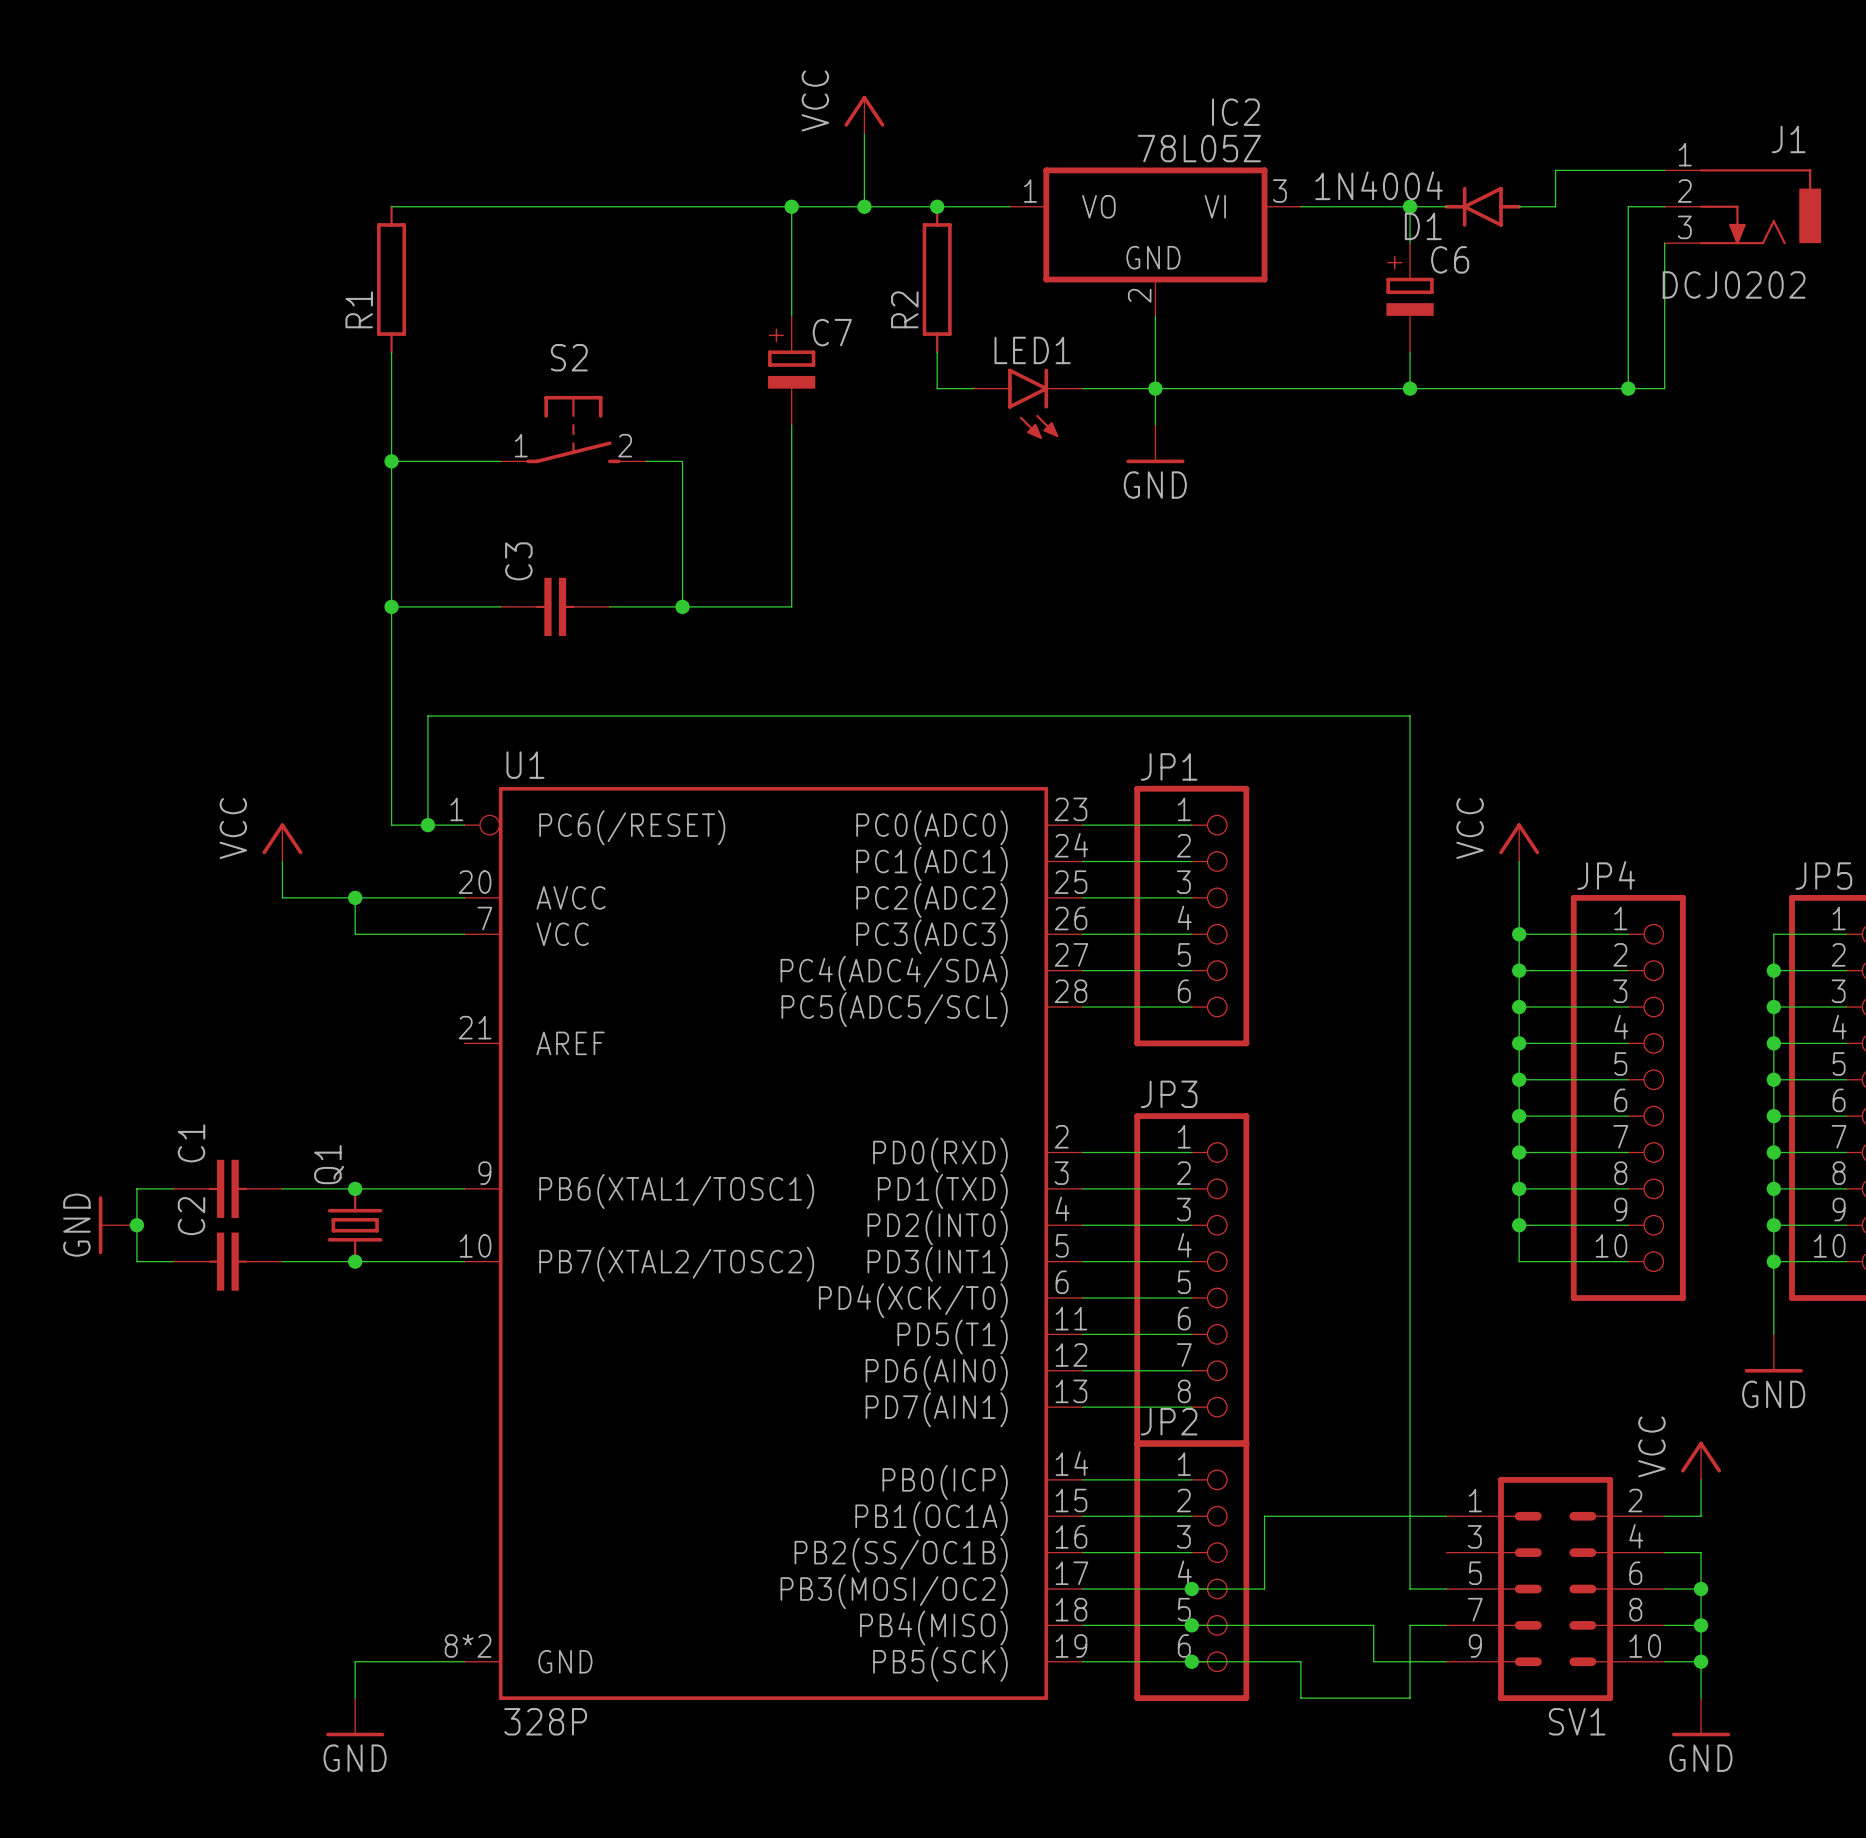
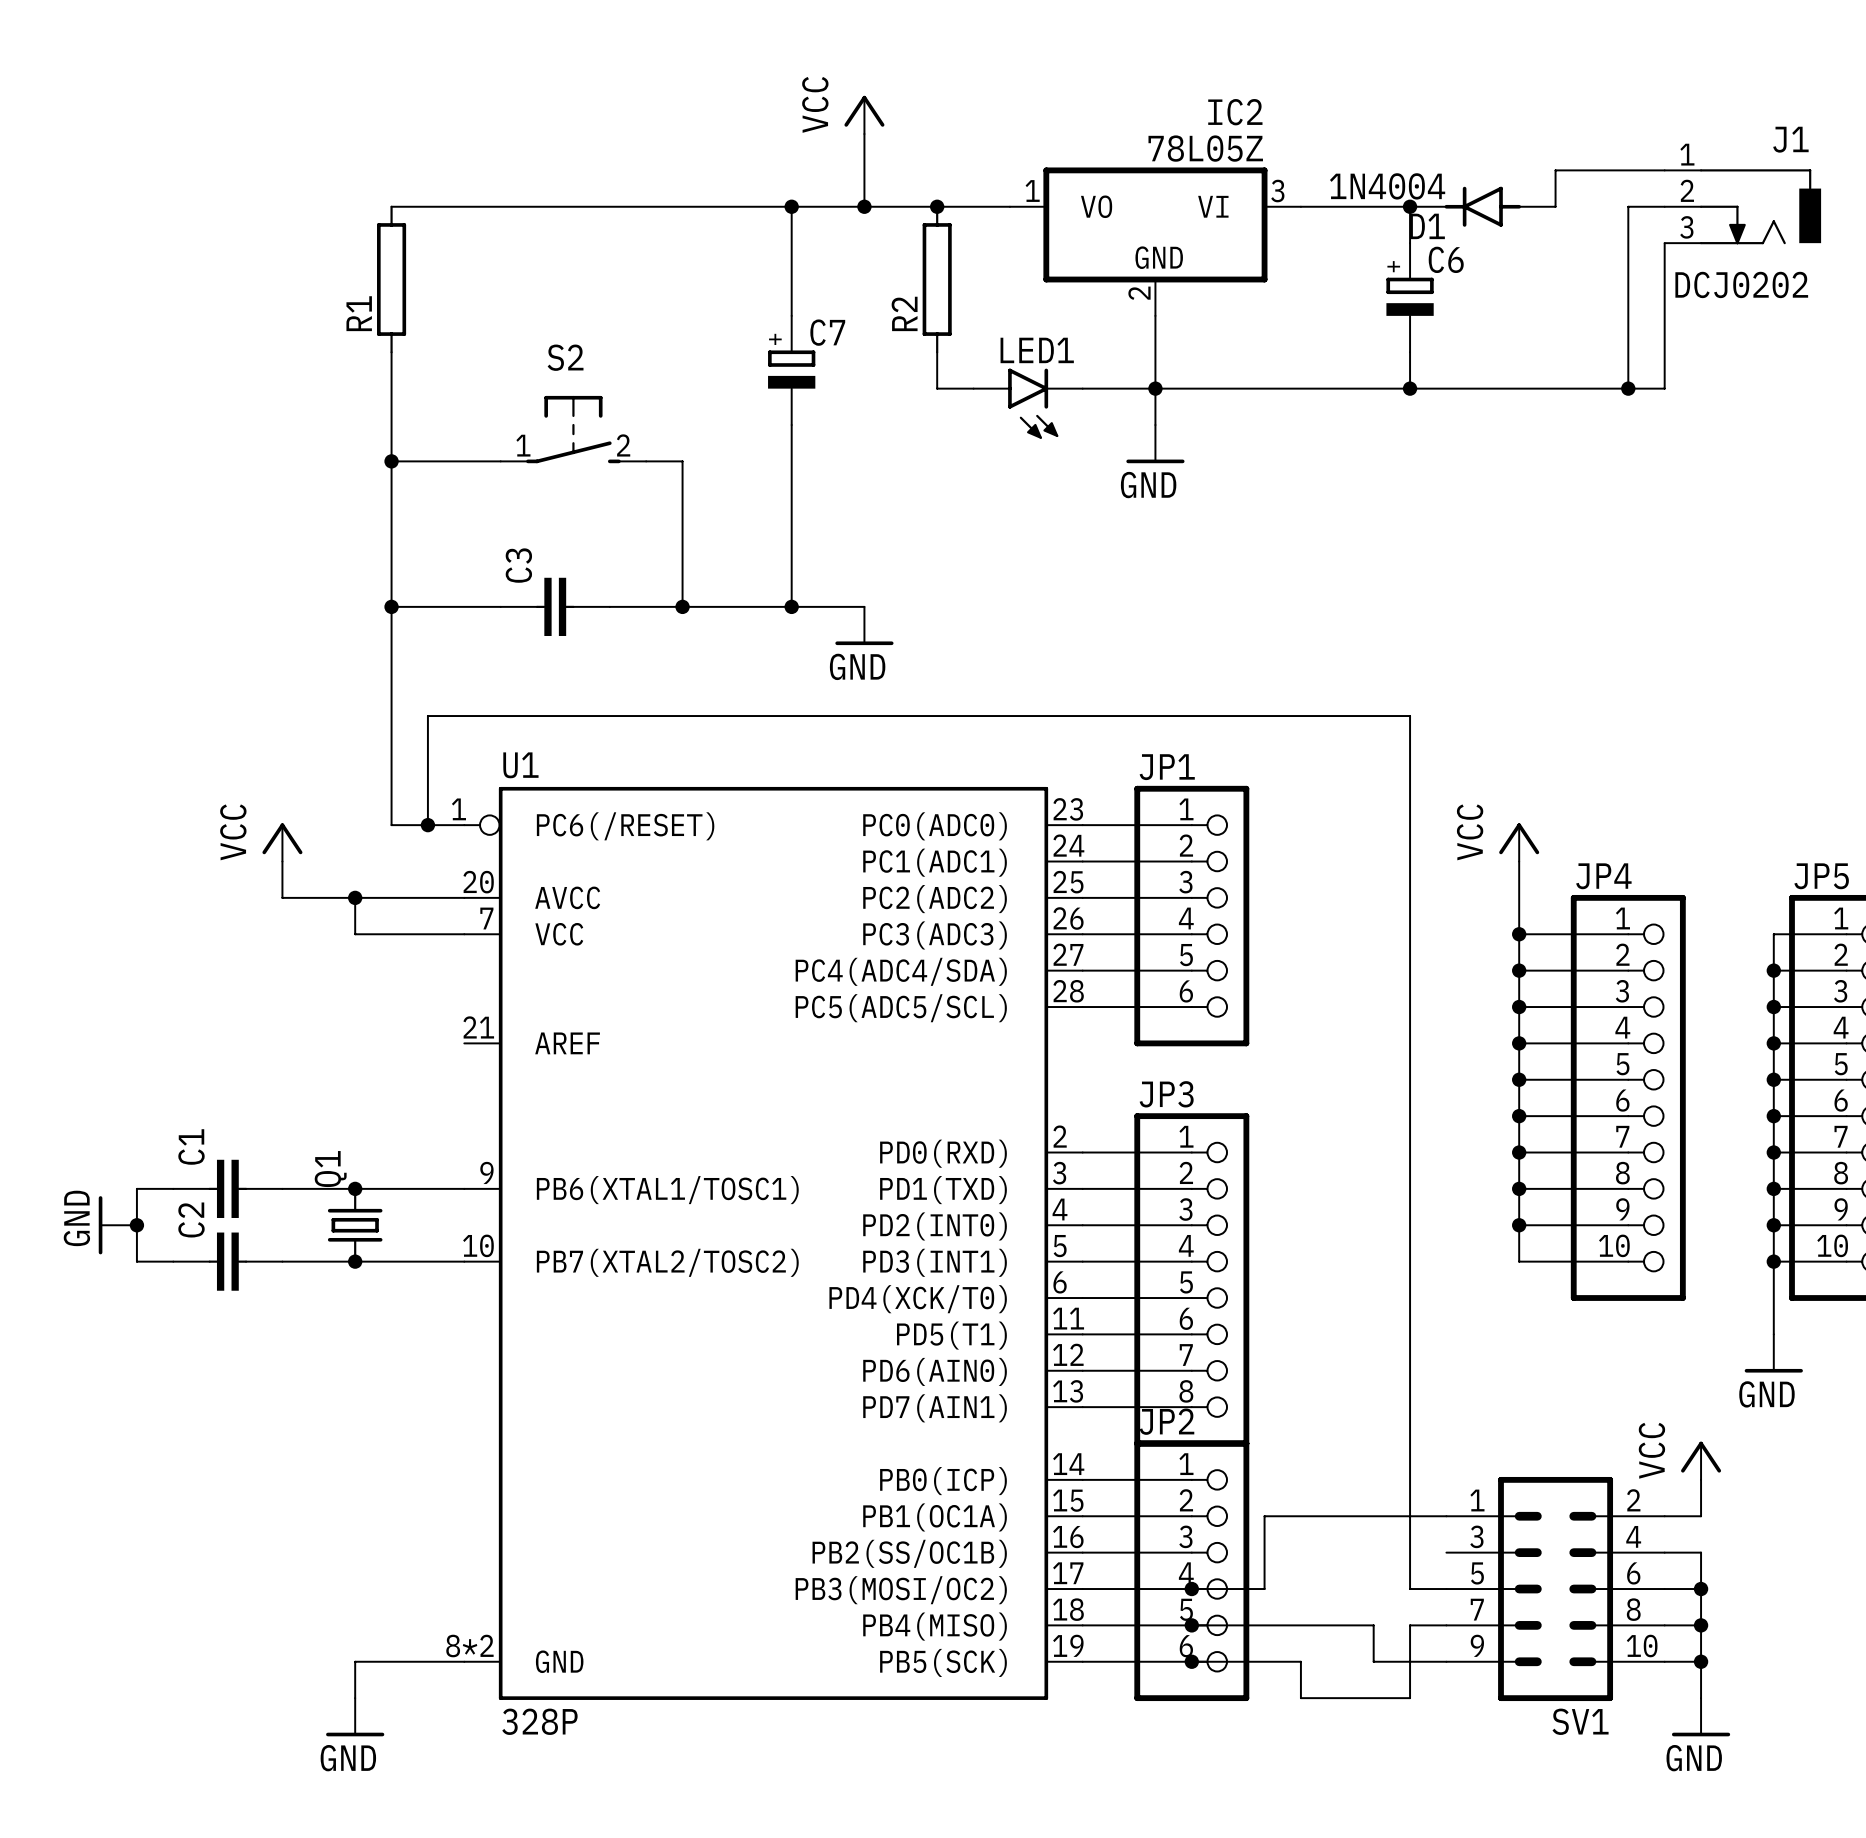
wire: none -> (791, 606) (864, 606)
junction: none -> (791, 606)
power symbol: none -> GND (864, 625)

